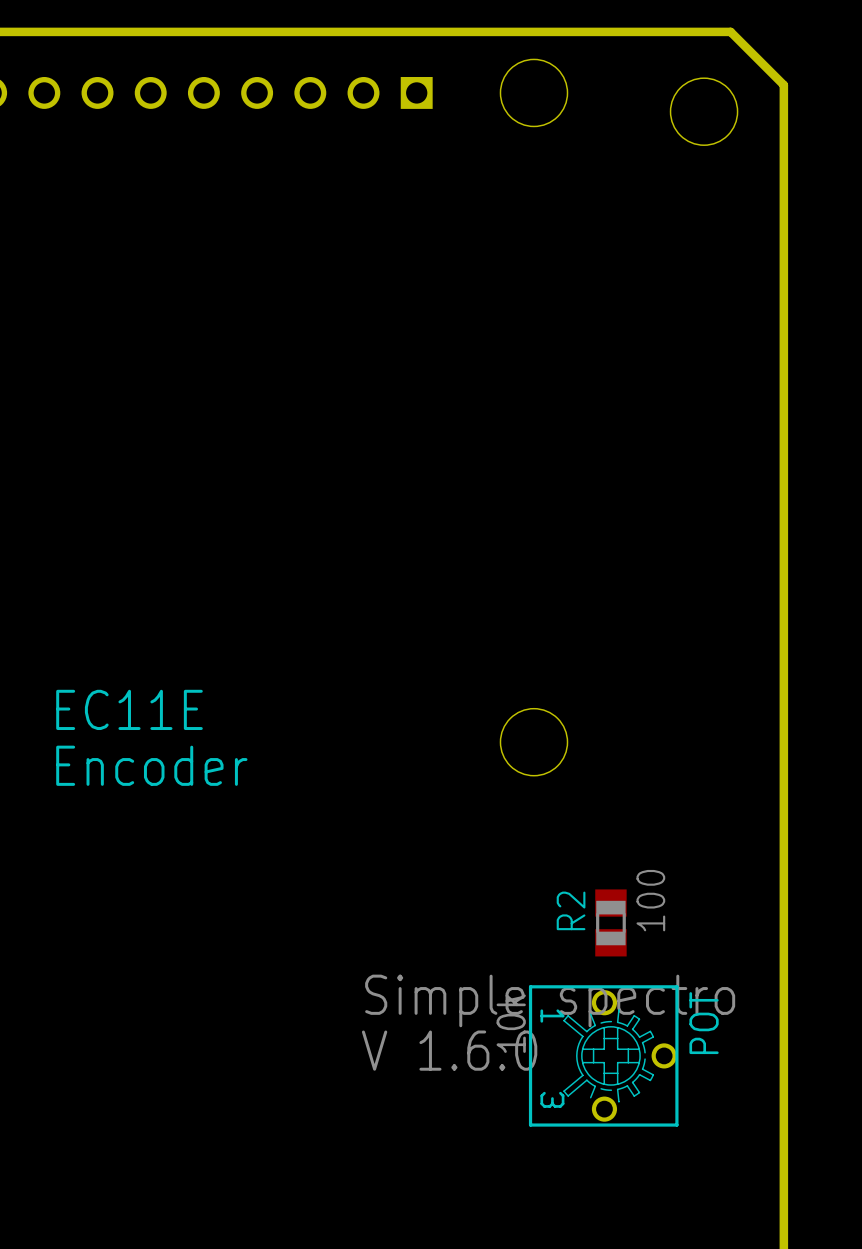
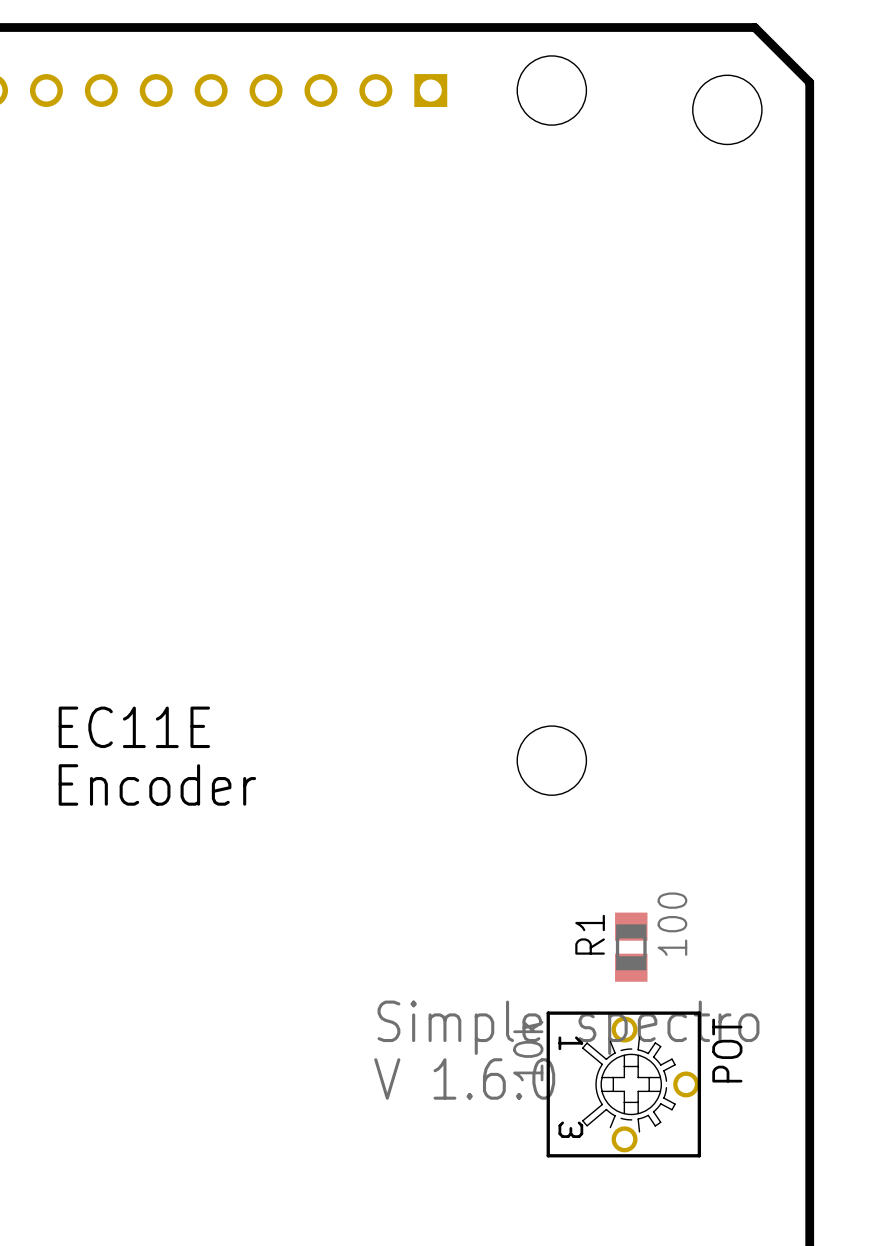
R2 name: R2 (571, 910) -> R1 (590, 934)

